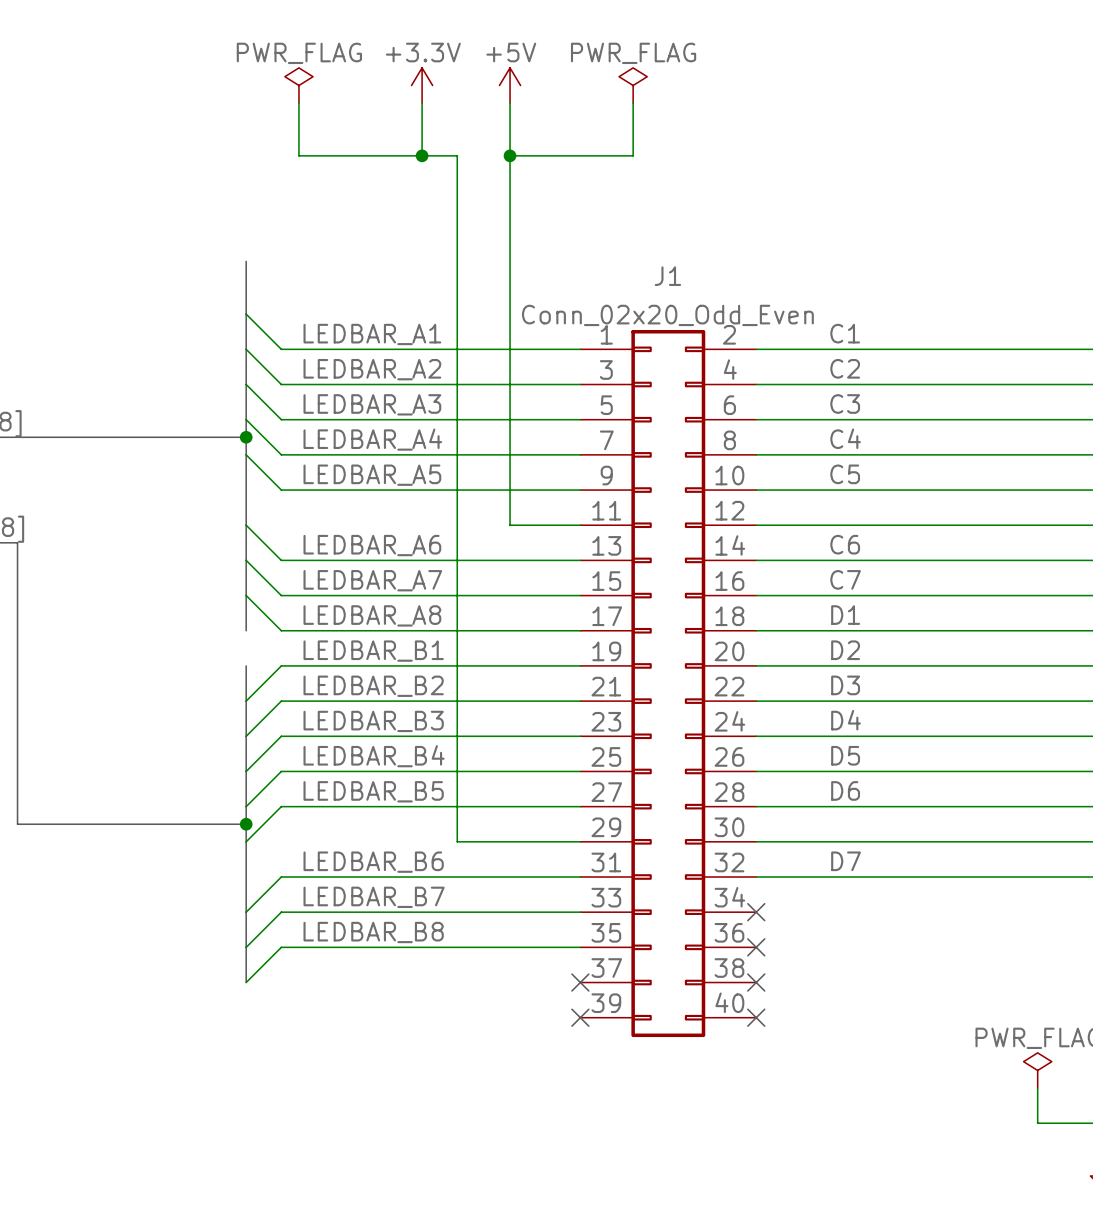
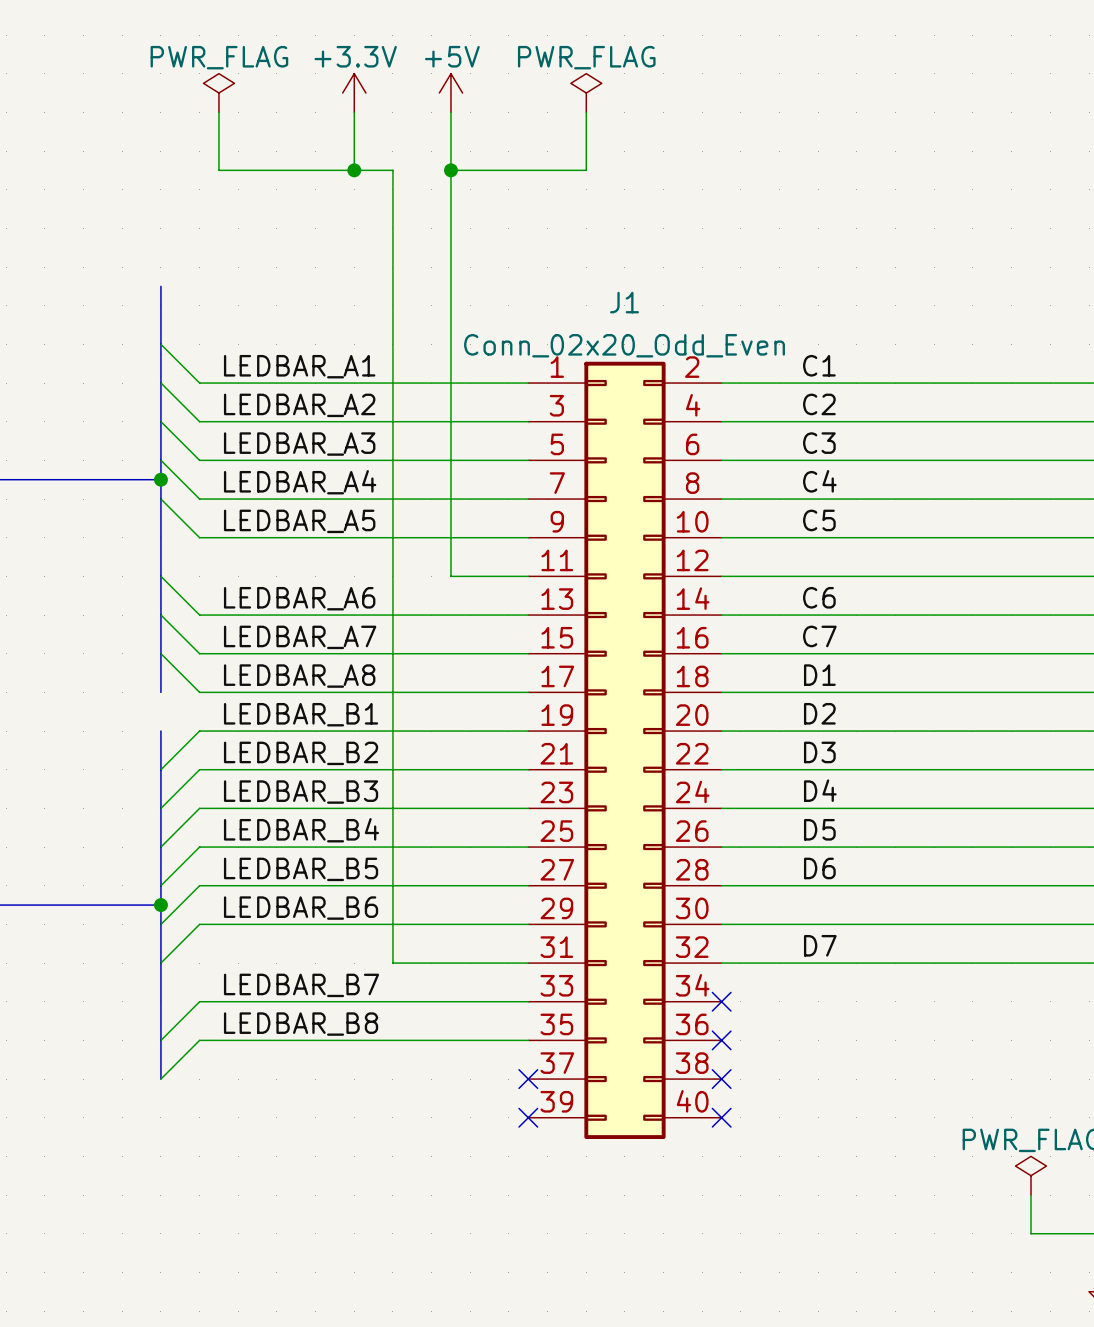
label position: LEDBAR_B6 (373, 862) -> LEDBAR_B6 (301, 908)
wire: (457, 876) (281, 876) (246, 912) -> (392, 963) (392, 924) (199, 924) (160, 963)

